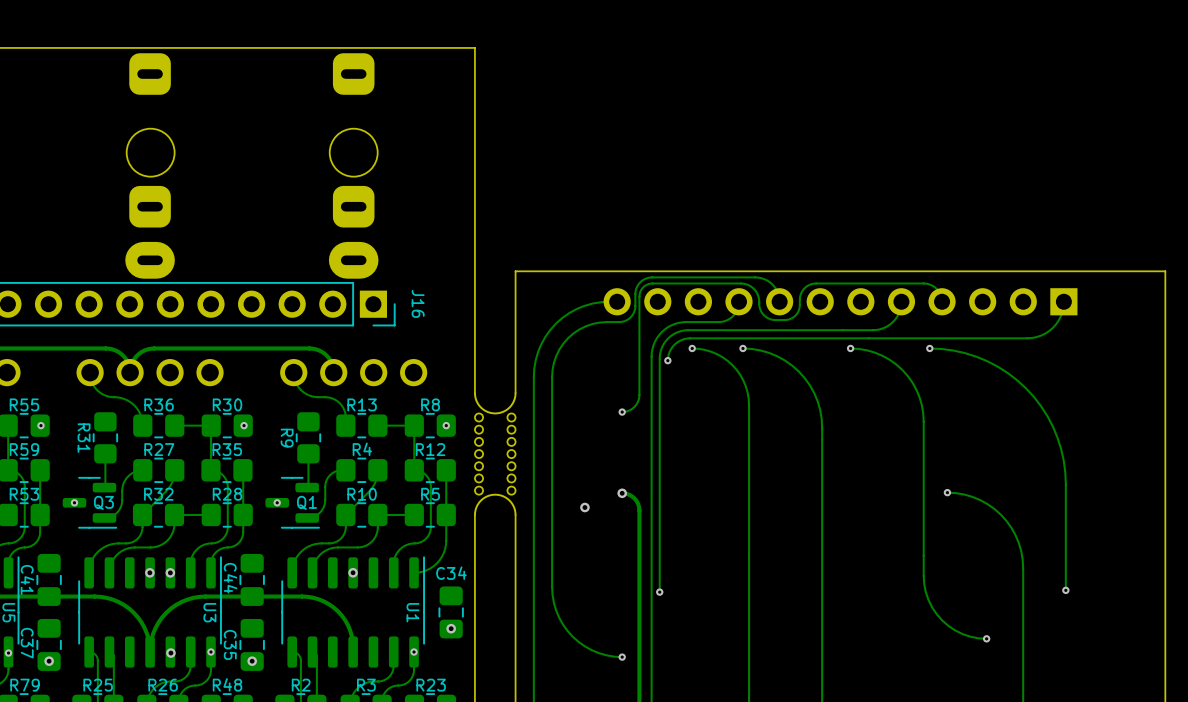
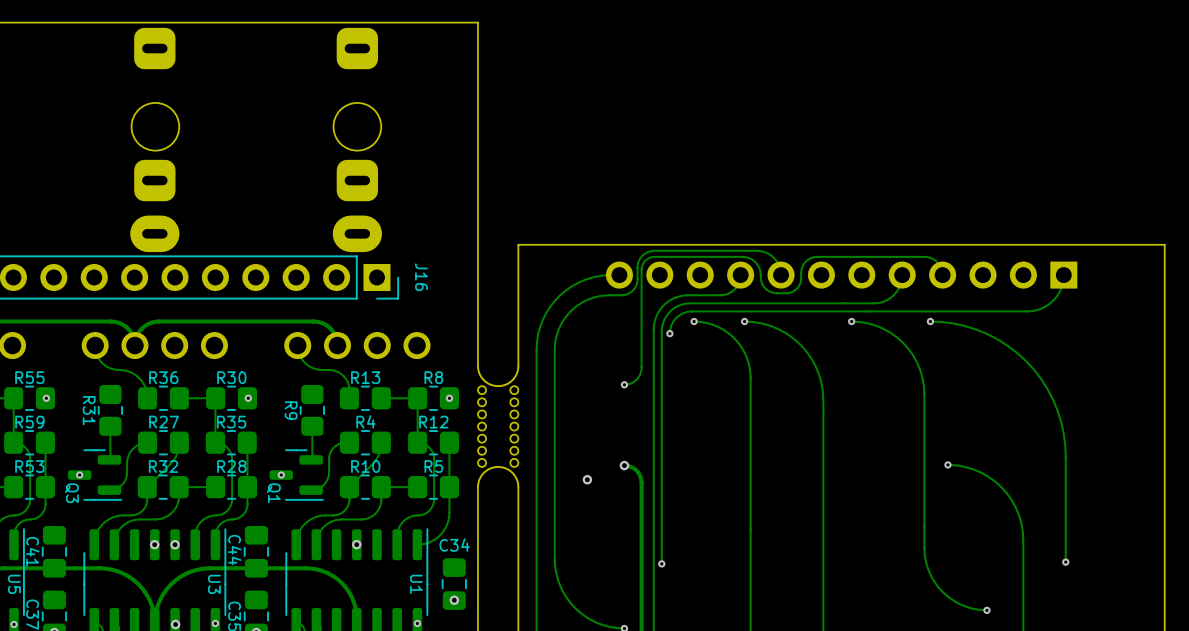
Q3 name rotation: 0° (103, 502) -> 90° clockwise (71, 493)
Q3 name position: Q3 (103, 502) -> Q3 (71, 493)
Q1 name rotation: 0° (306, 502) -> 90° clockwise (273, 493)
Q1 name position: Q1 (306, 502) -> Q1 (273, 493)

